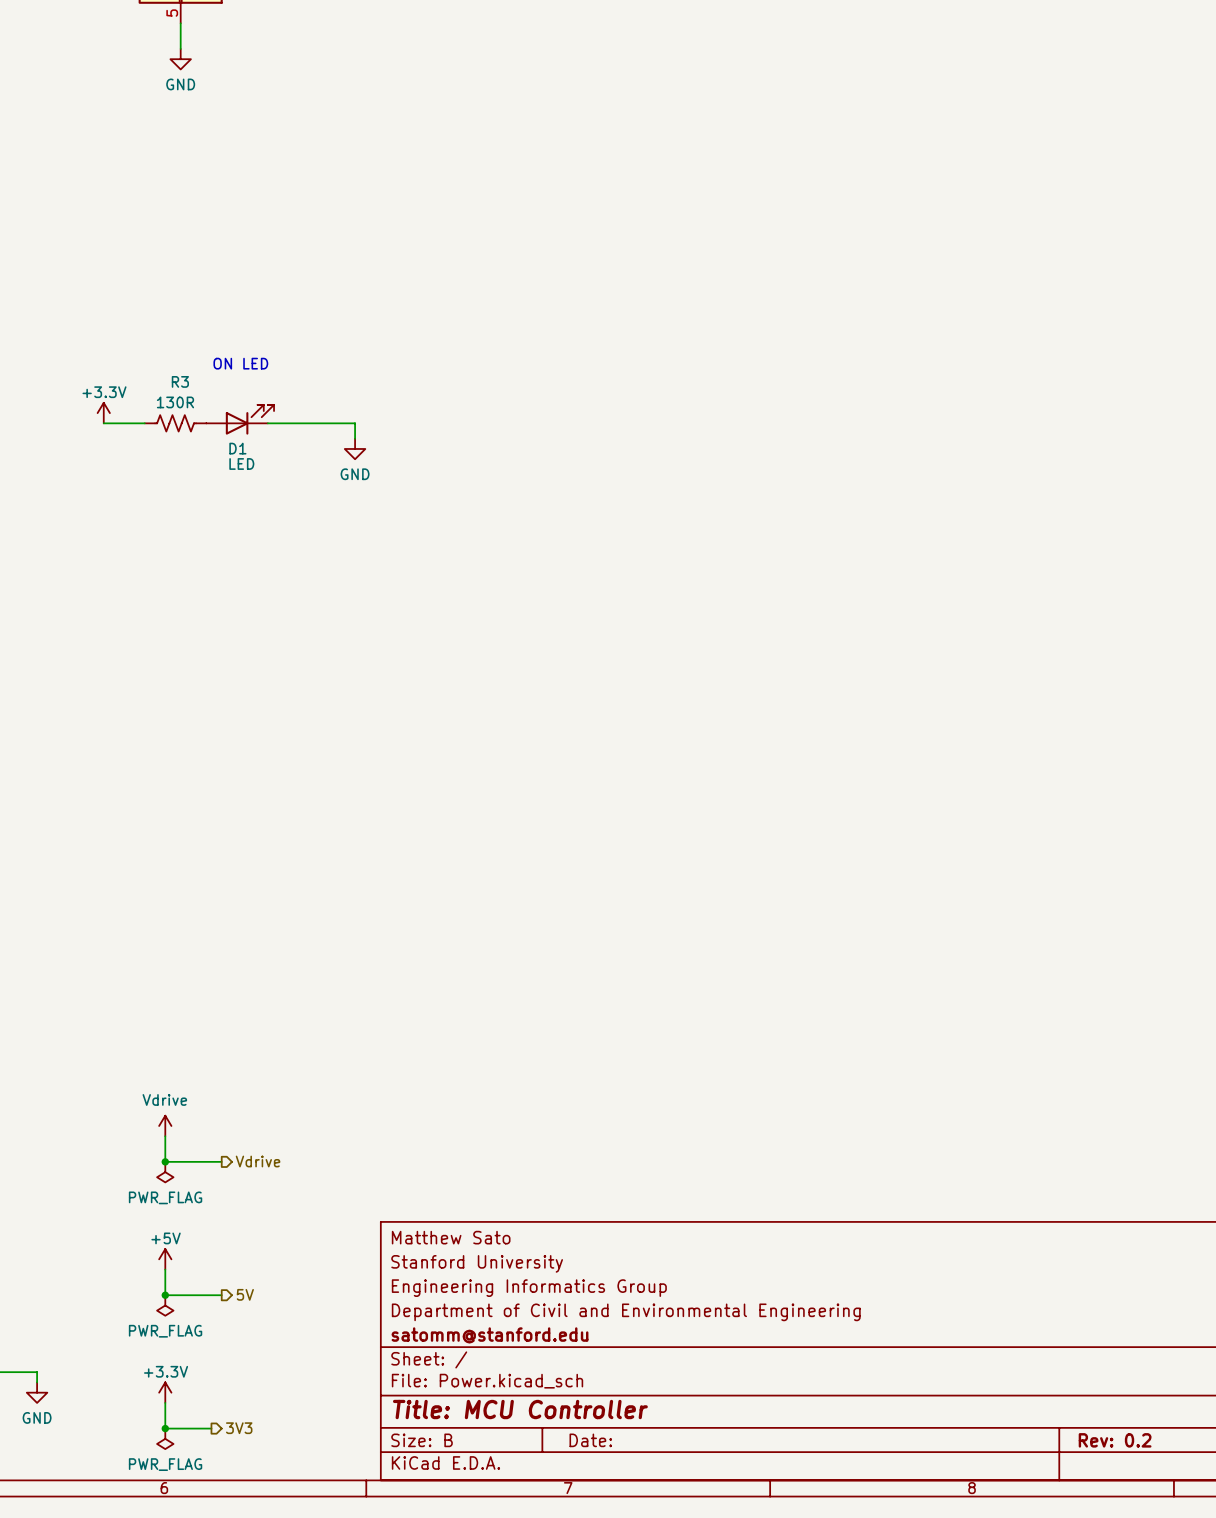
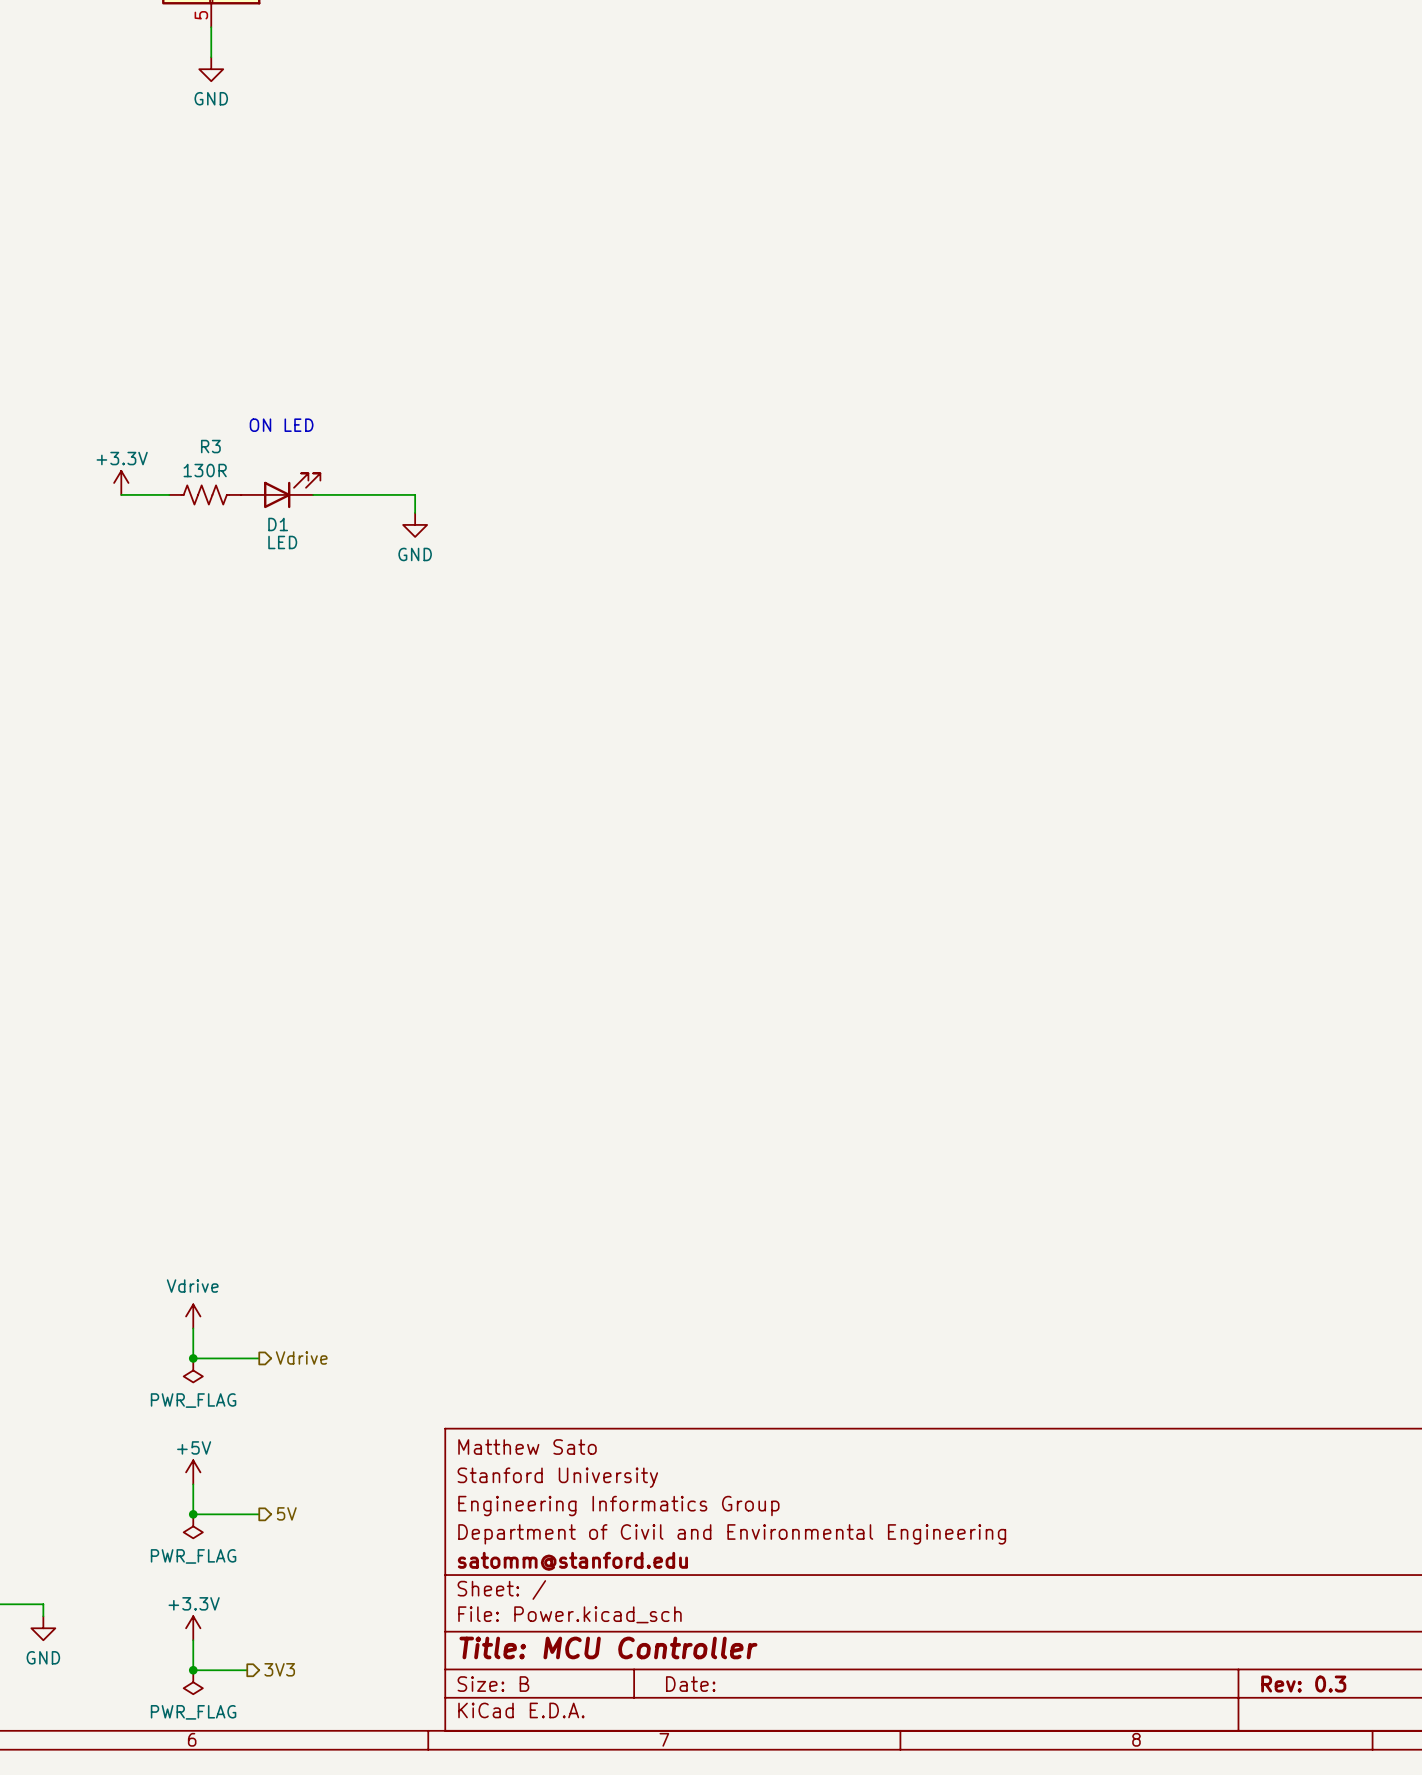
title block: Rev: 0.2 (1115, 1440) -> Rev: 0.3 (1303, 1684)

